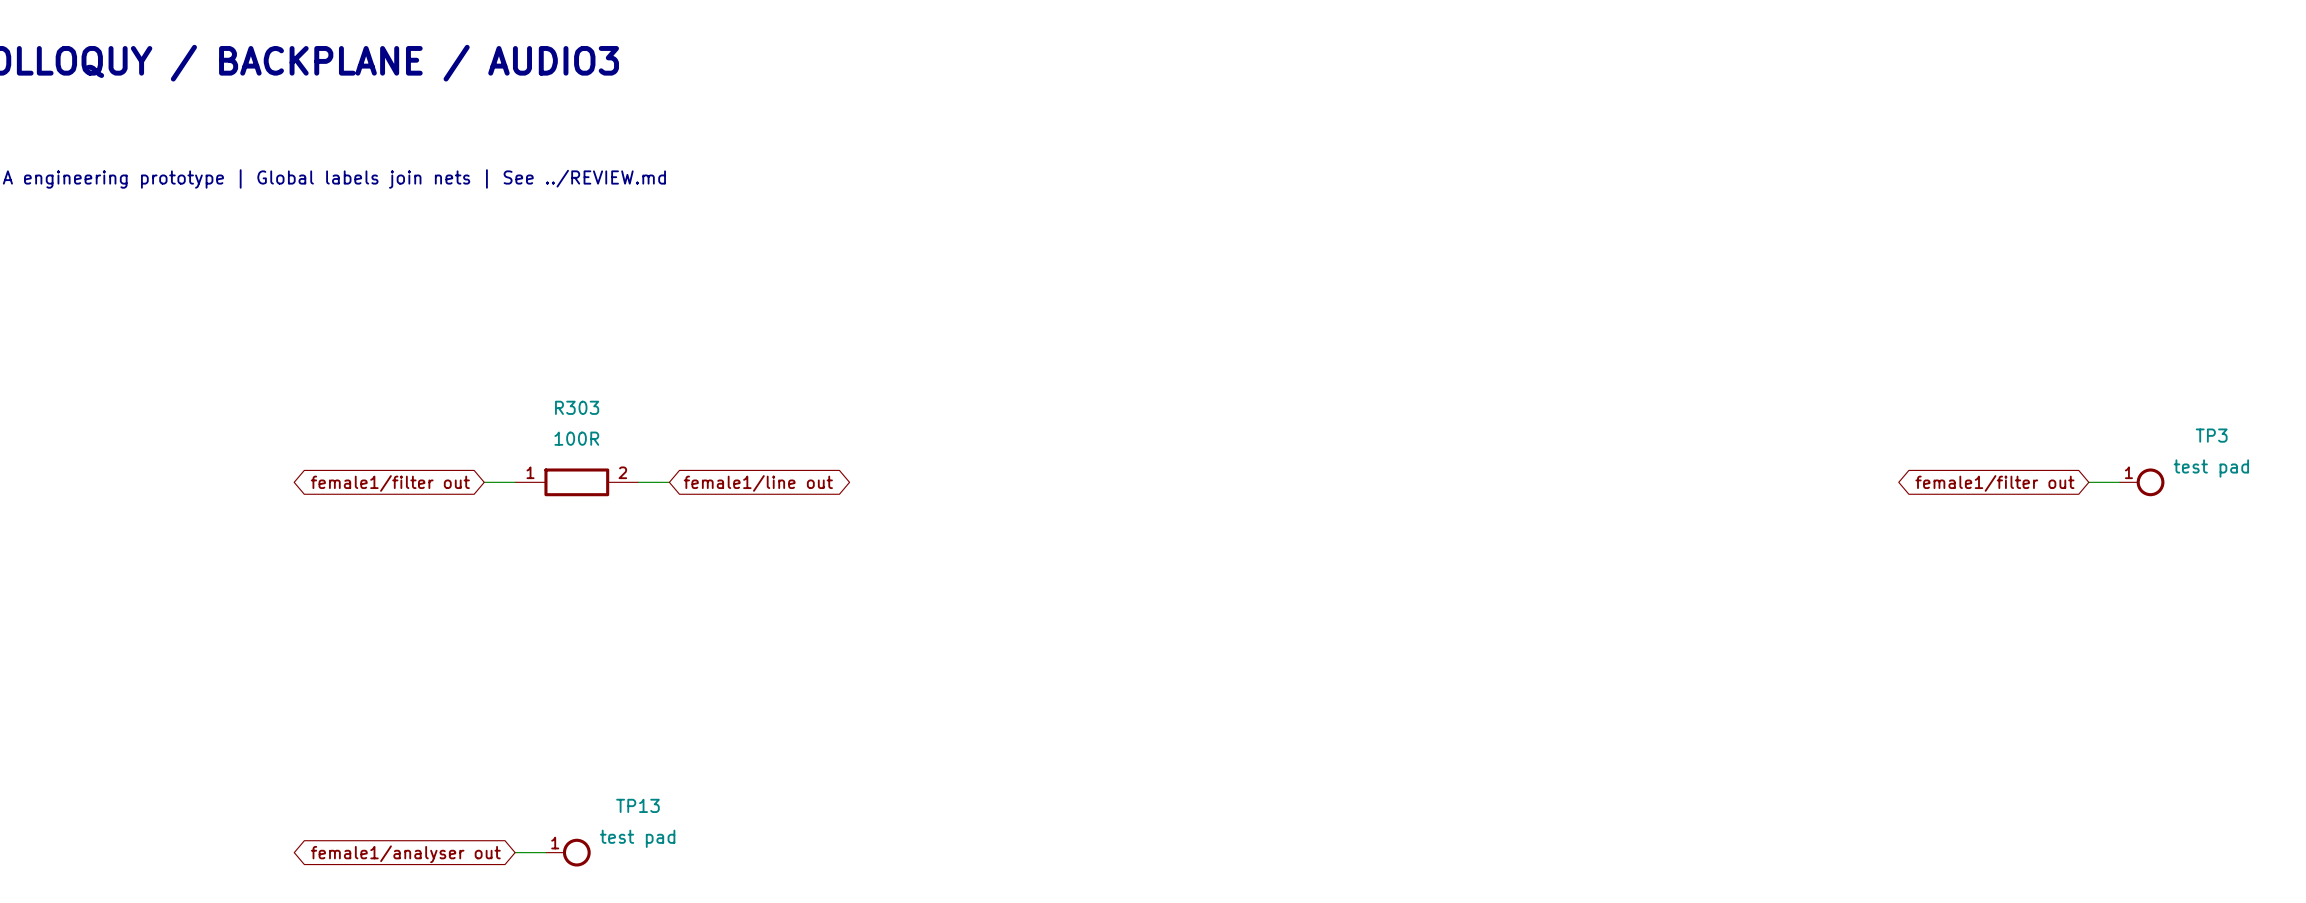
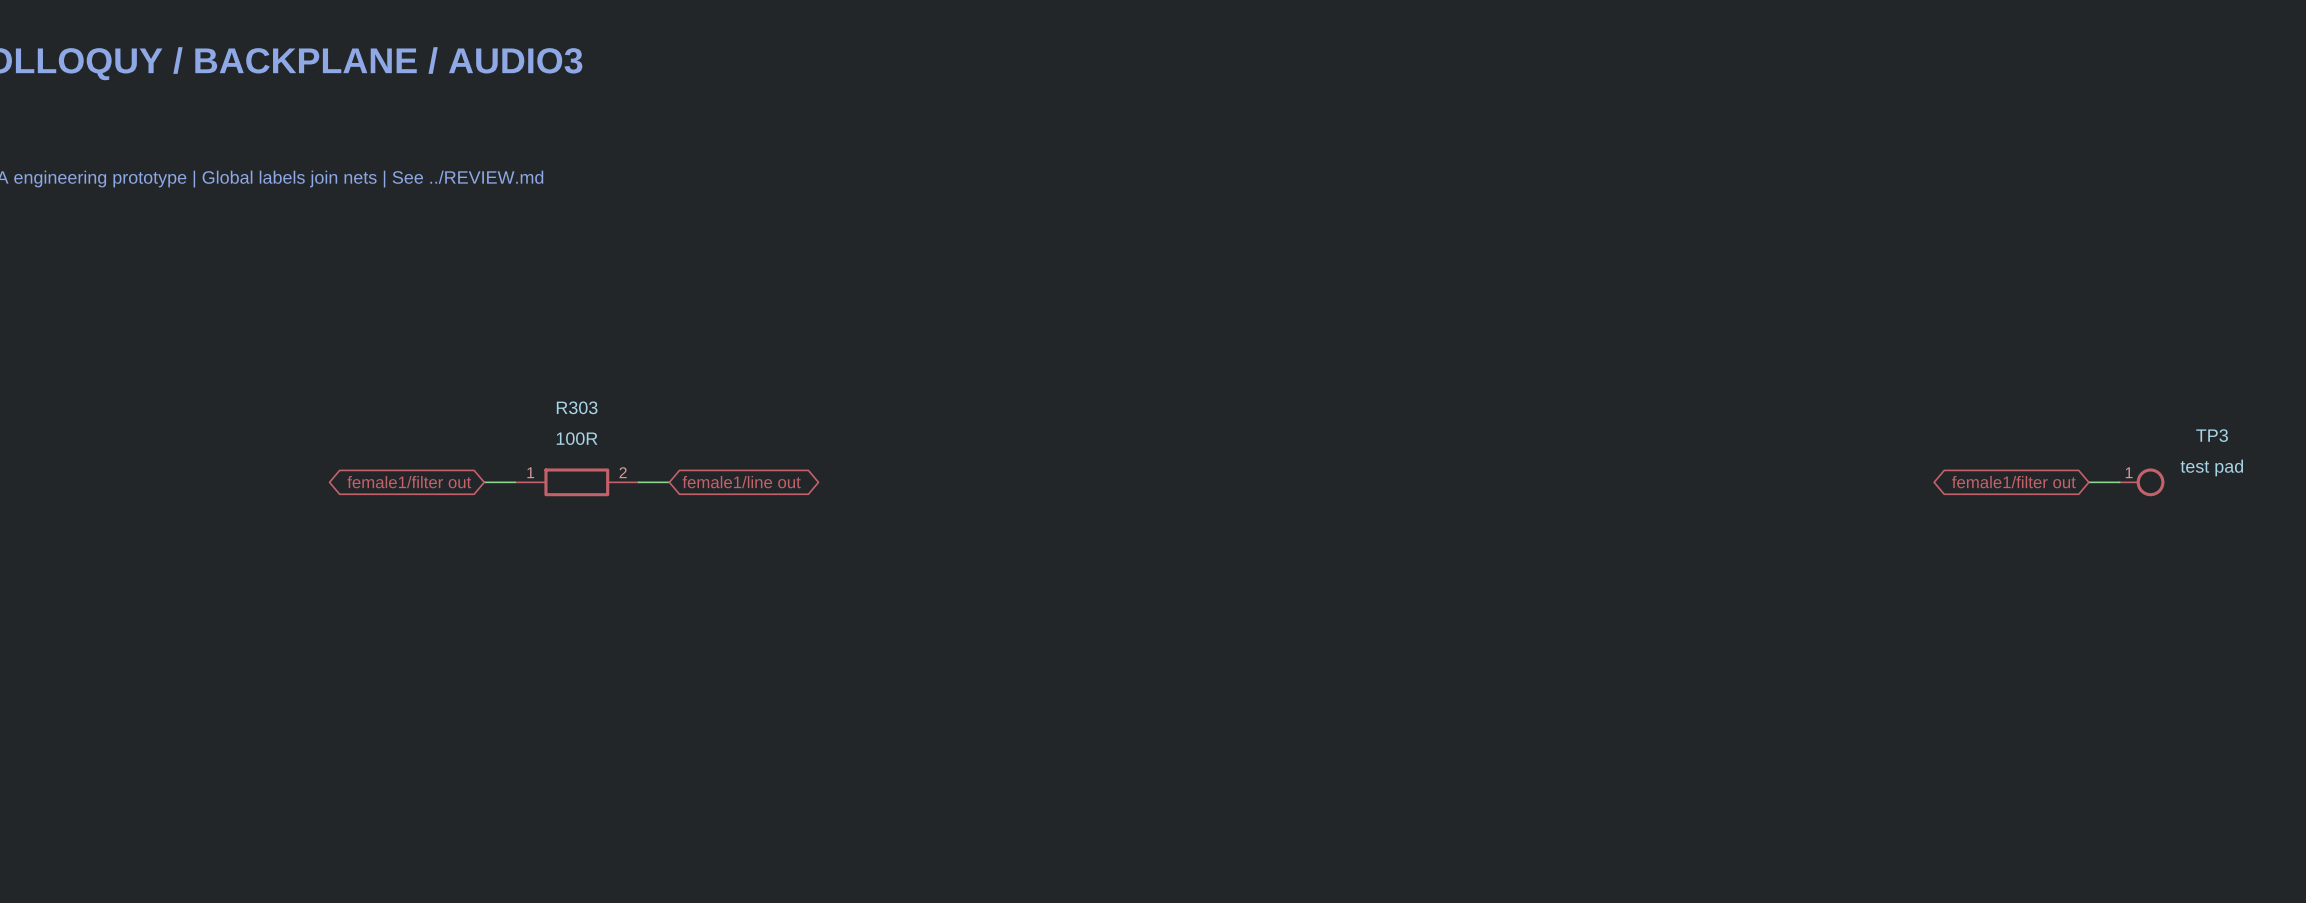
wire: (515, 852) (545, 852) -> none
TP13: test pad (568, 852) -> none
global label: female1/analyser out (405, 854) -> none

